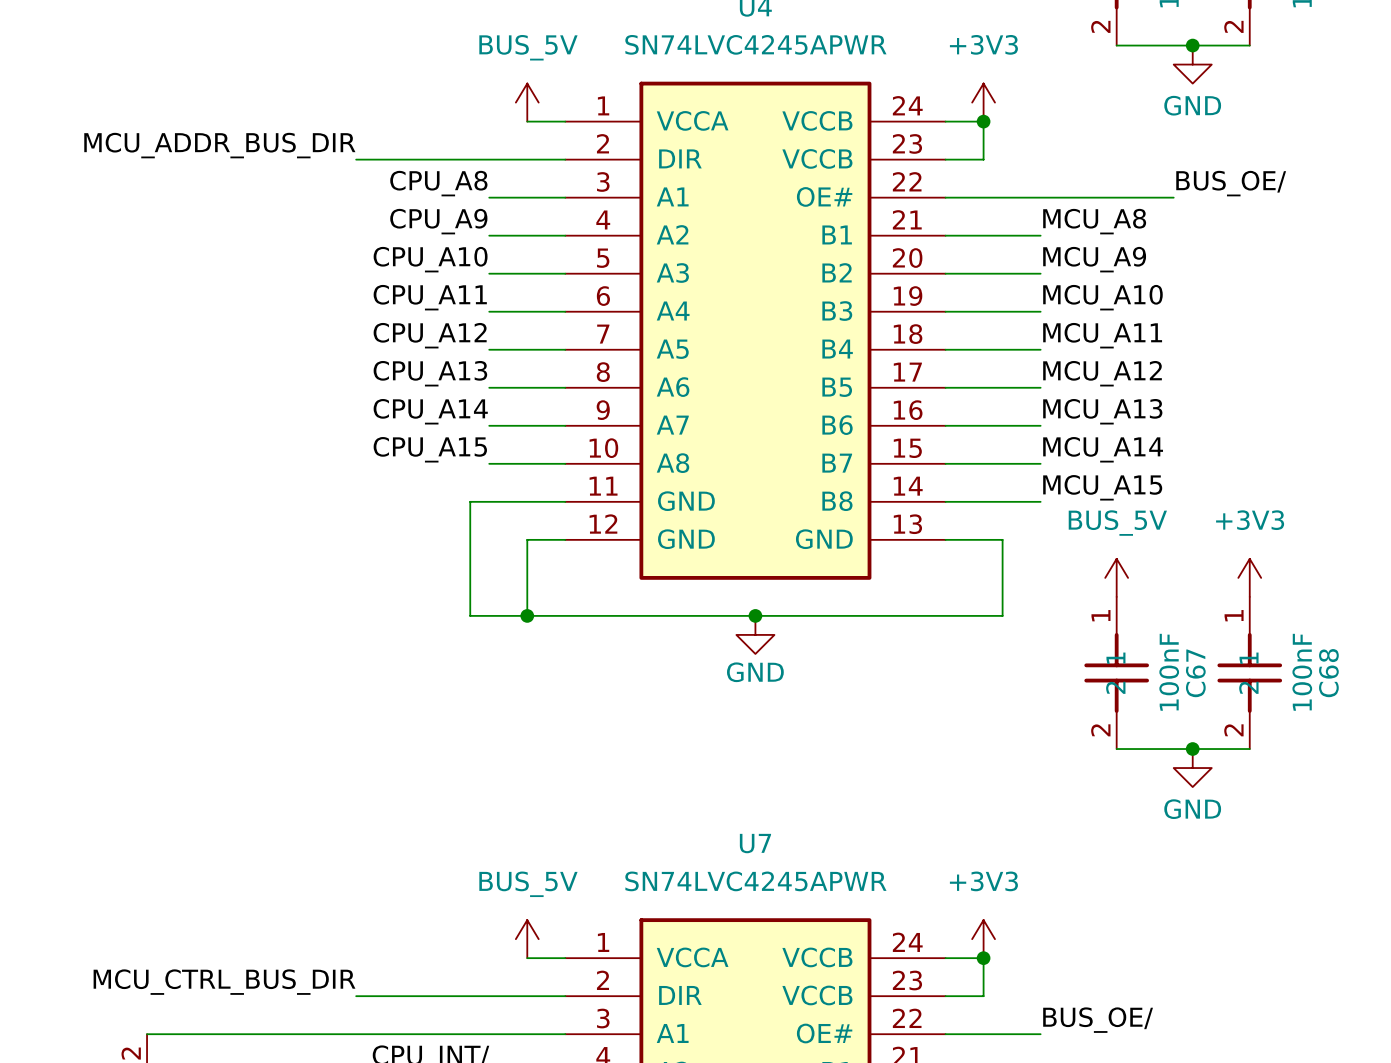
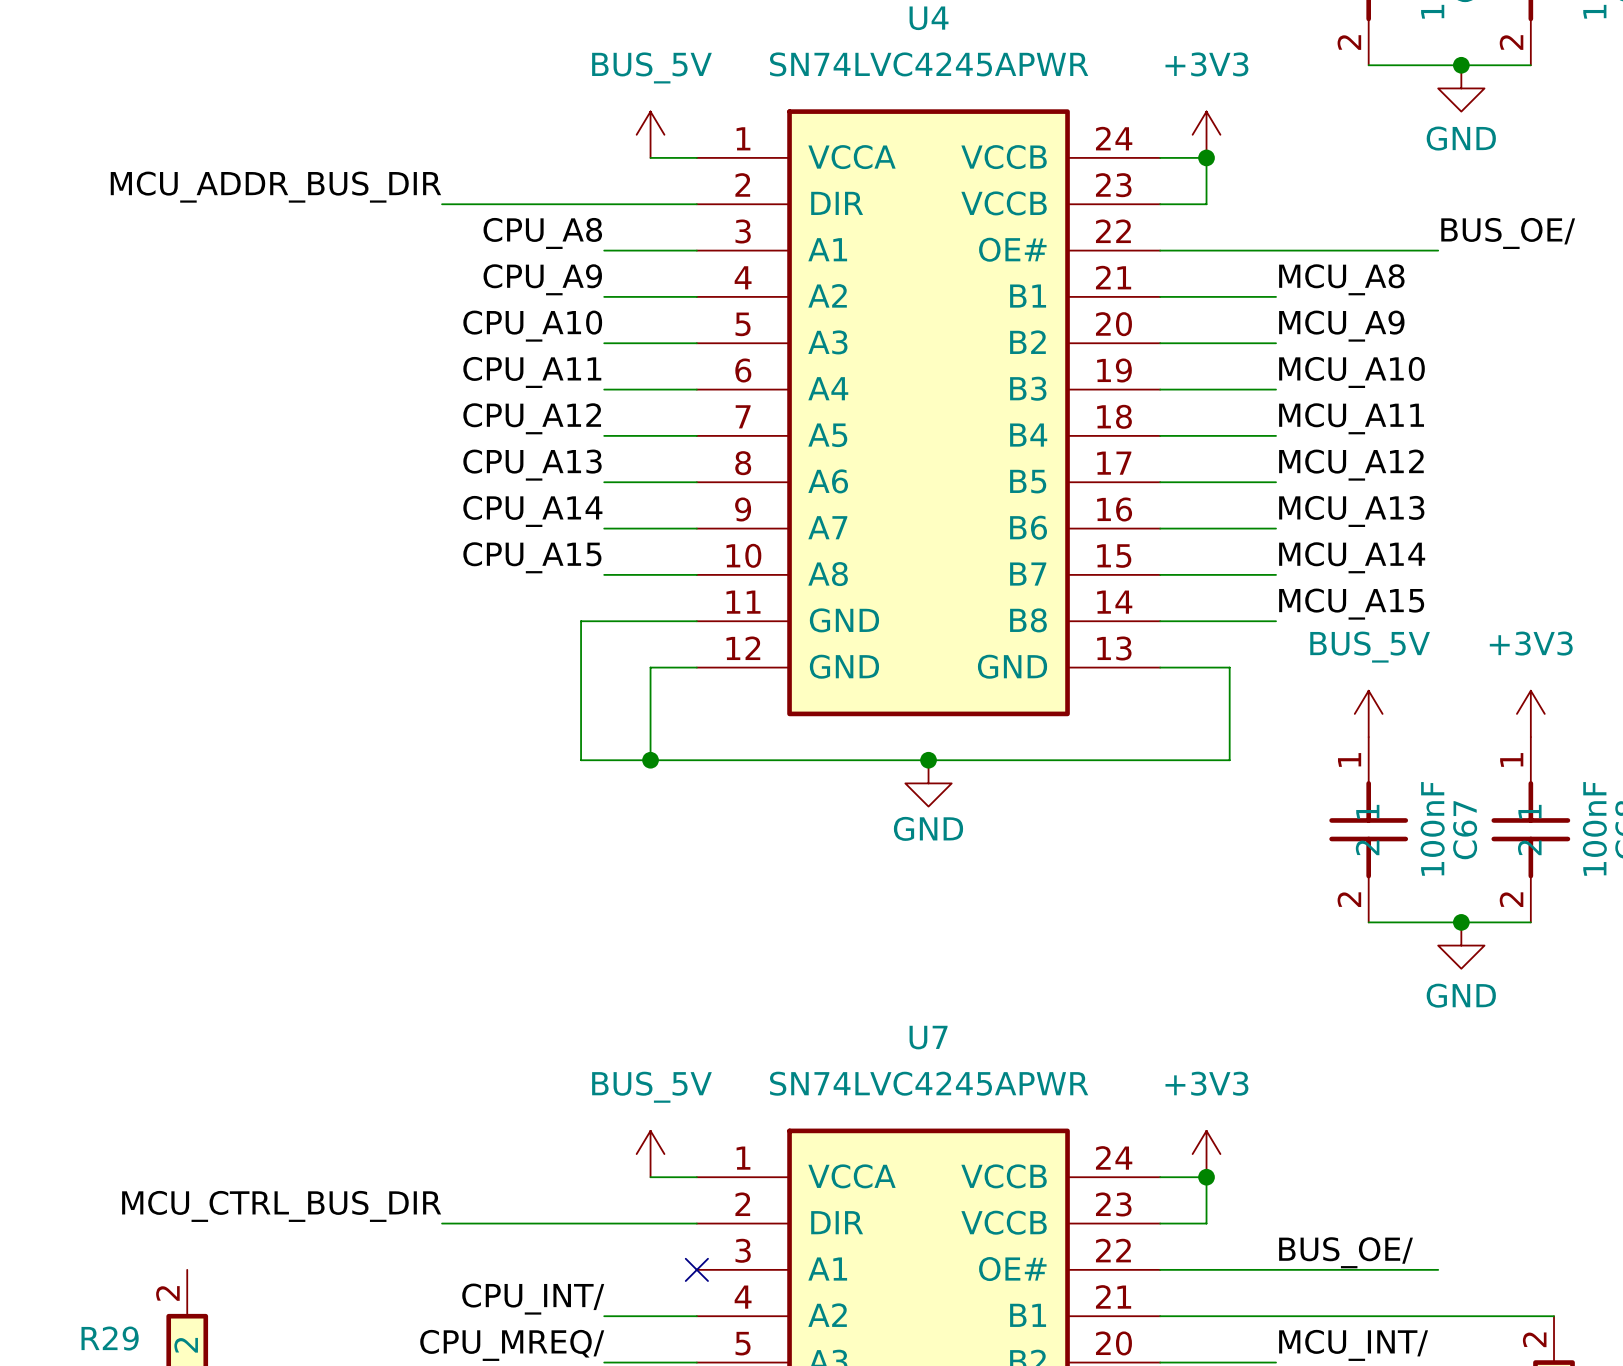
wire: (147, 1034) (565, 1034) -> none
no-connect mark: none -> (696, 1269)
wire: none -> (1276, 1269) (1438, 1269)

